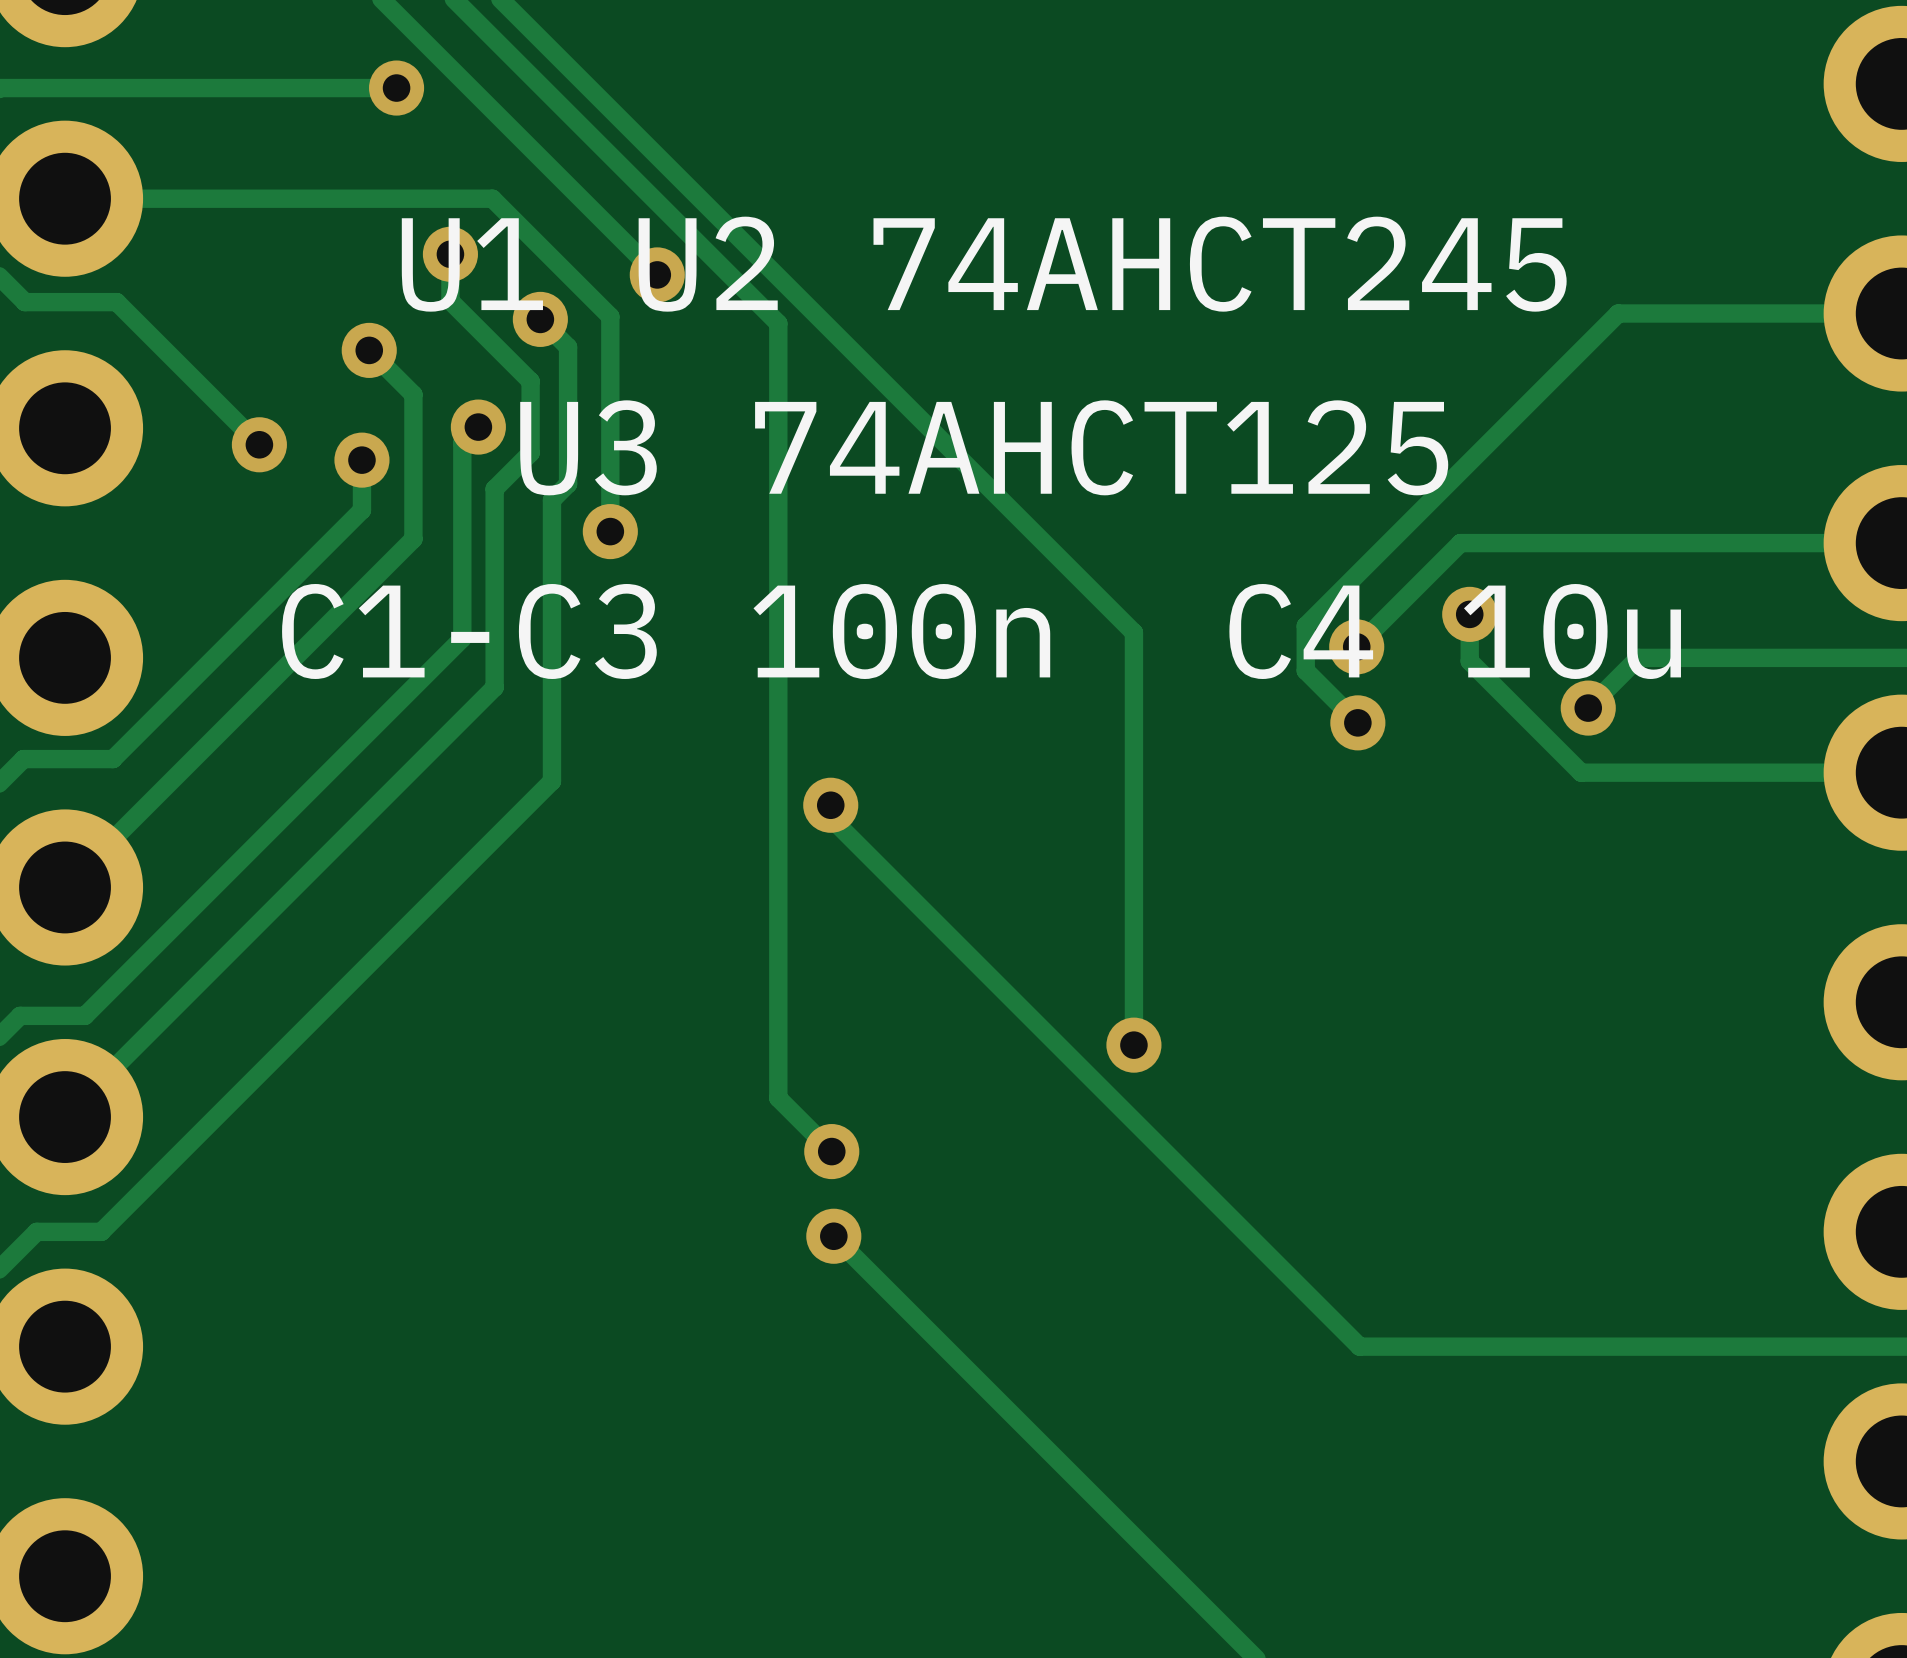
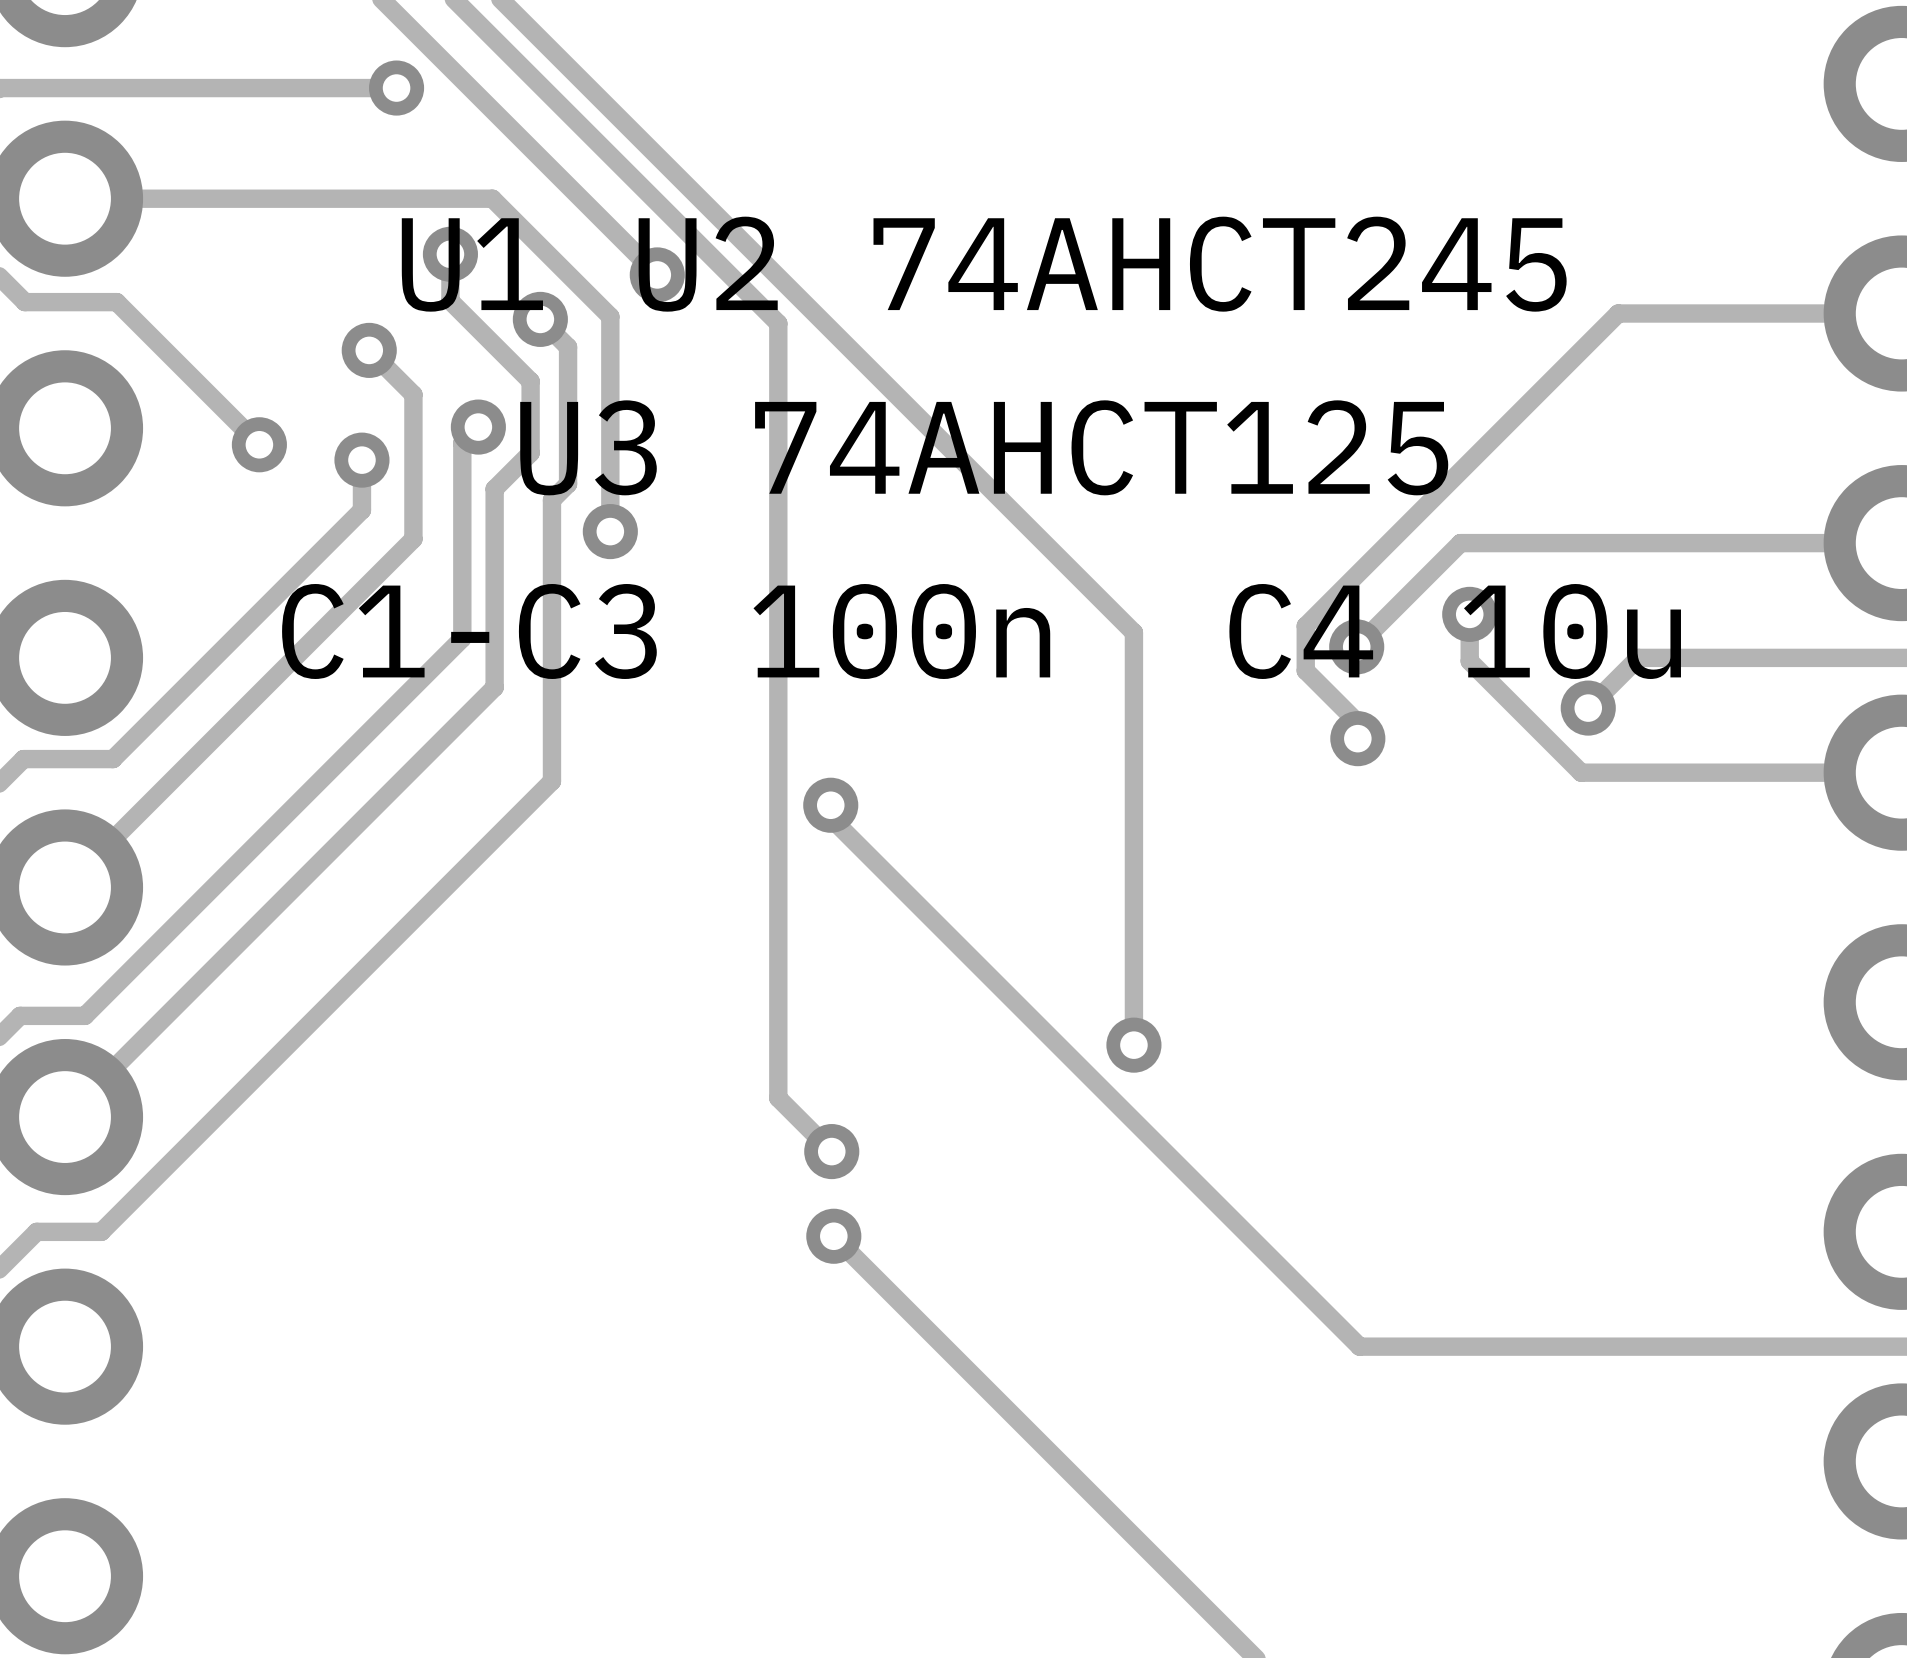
via position: (1357, 722) -> (1357, 738)

